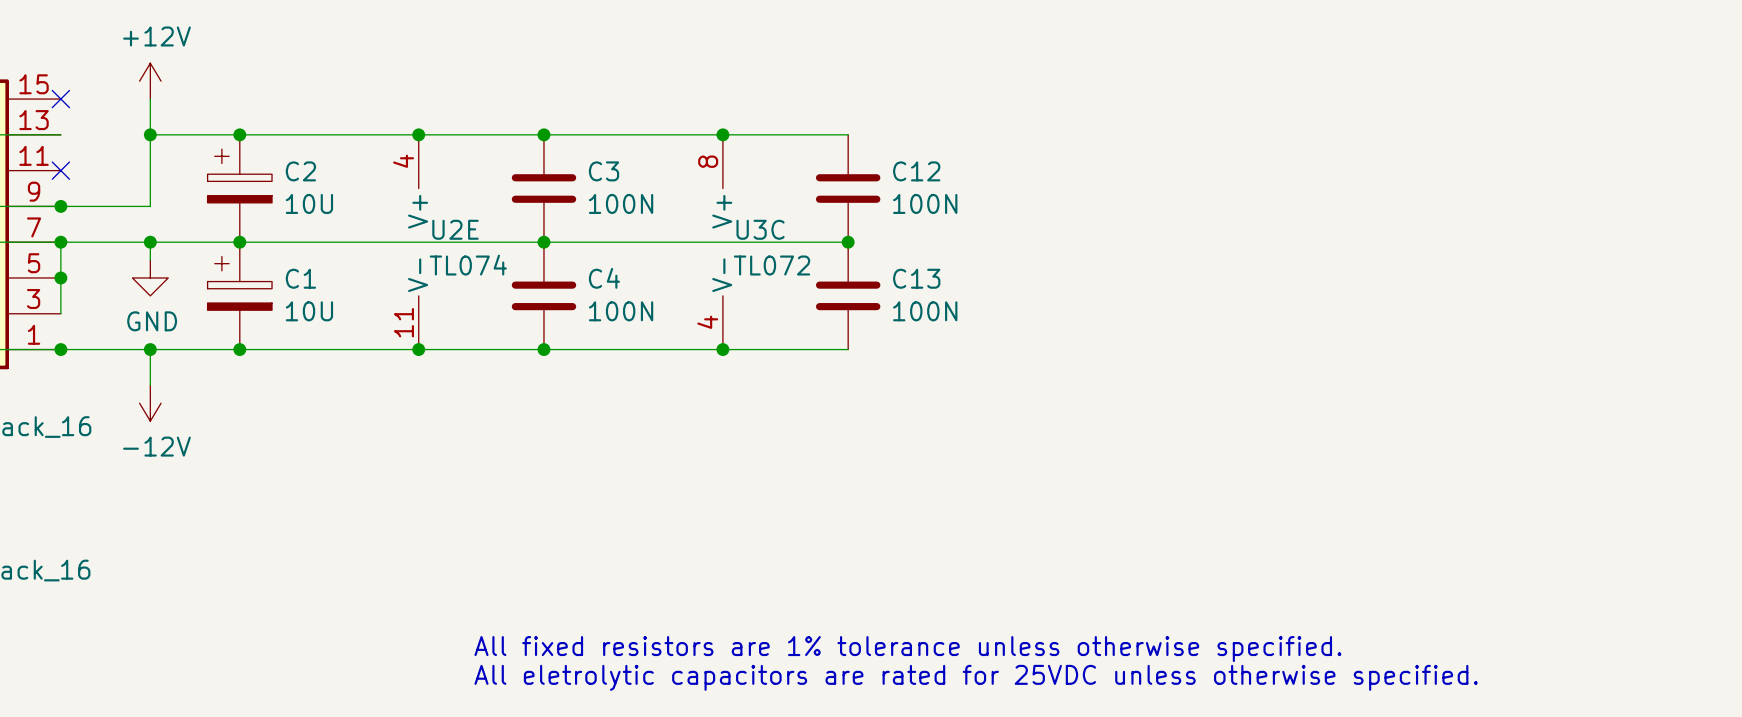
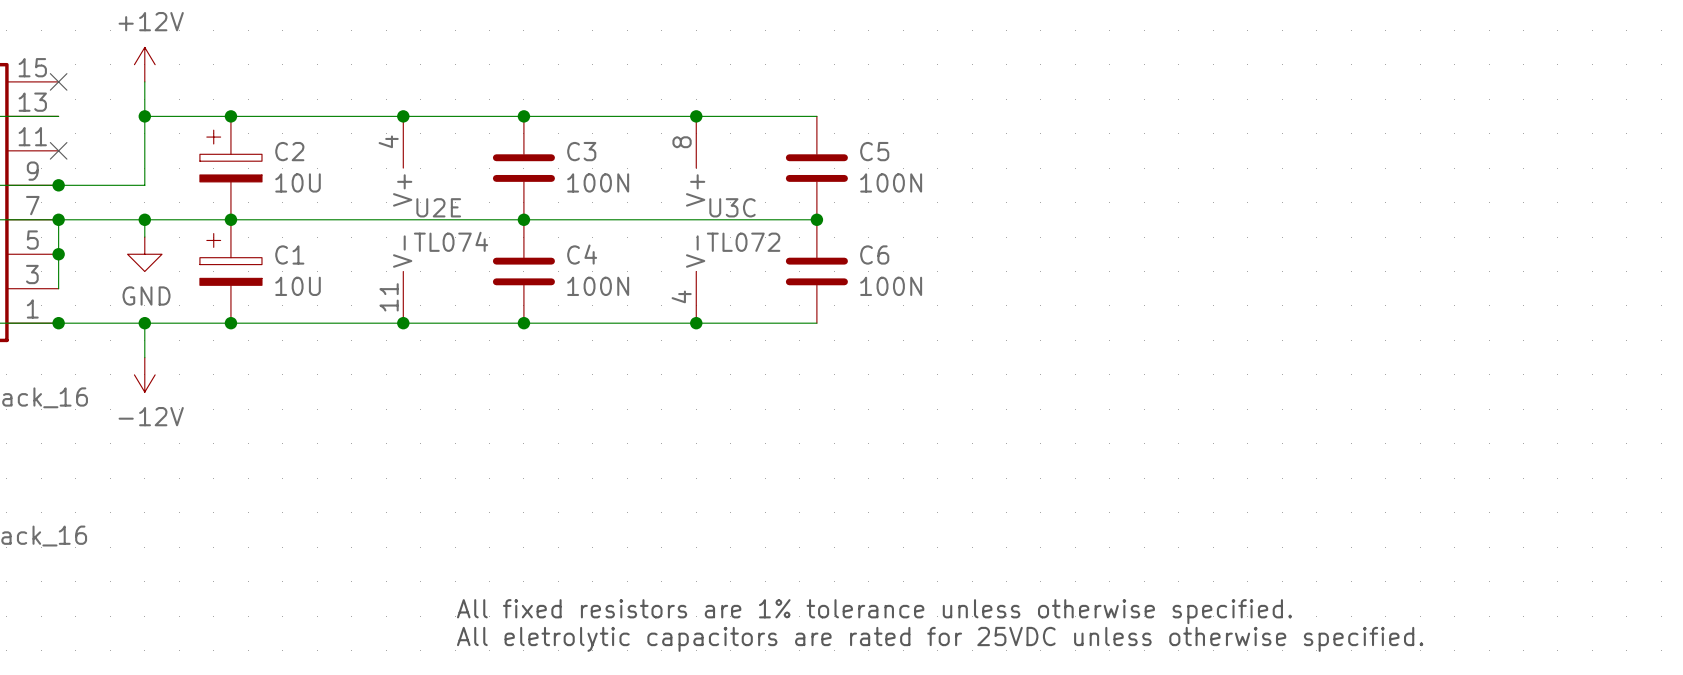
C12 name: C12 (916, 171) -> C5 (874, 151)
C13 name: C13 (916, 278) -> C6 (874, 254)

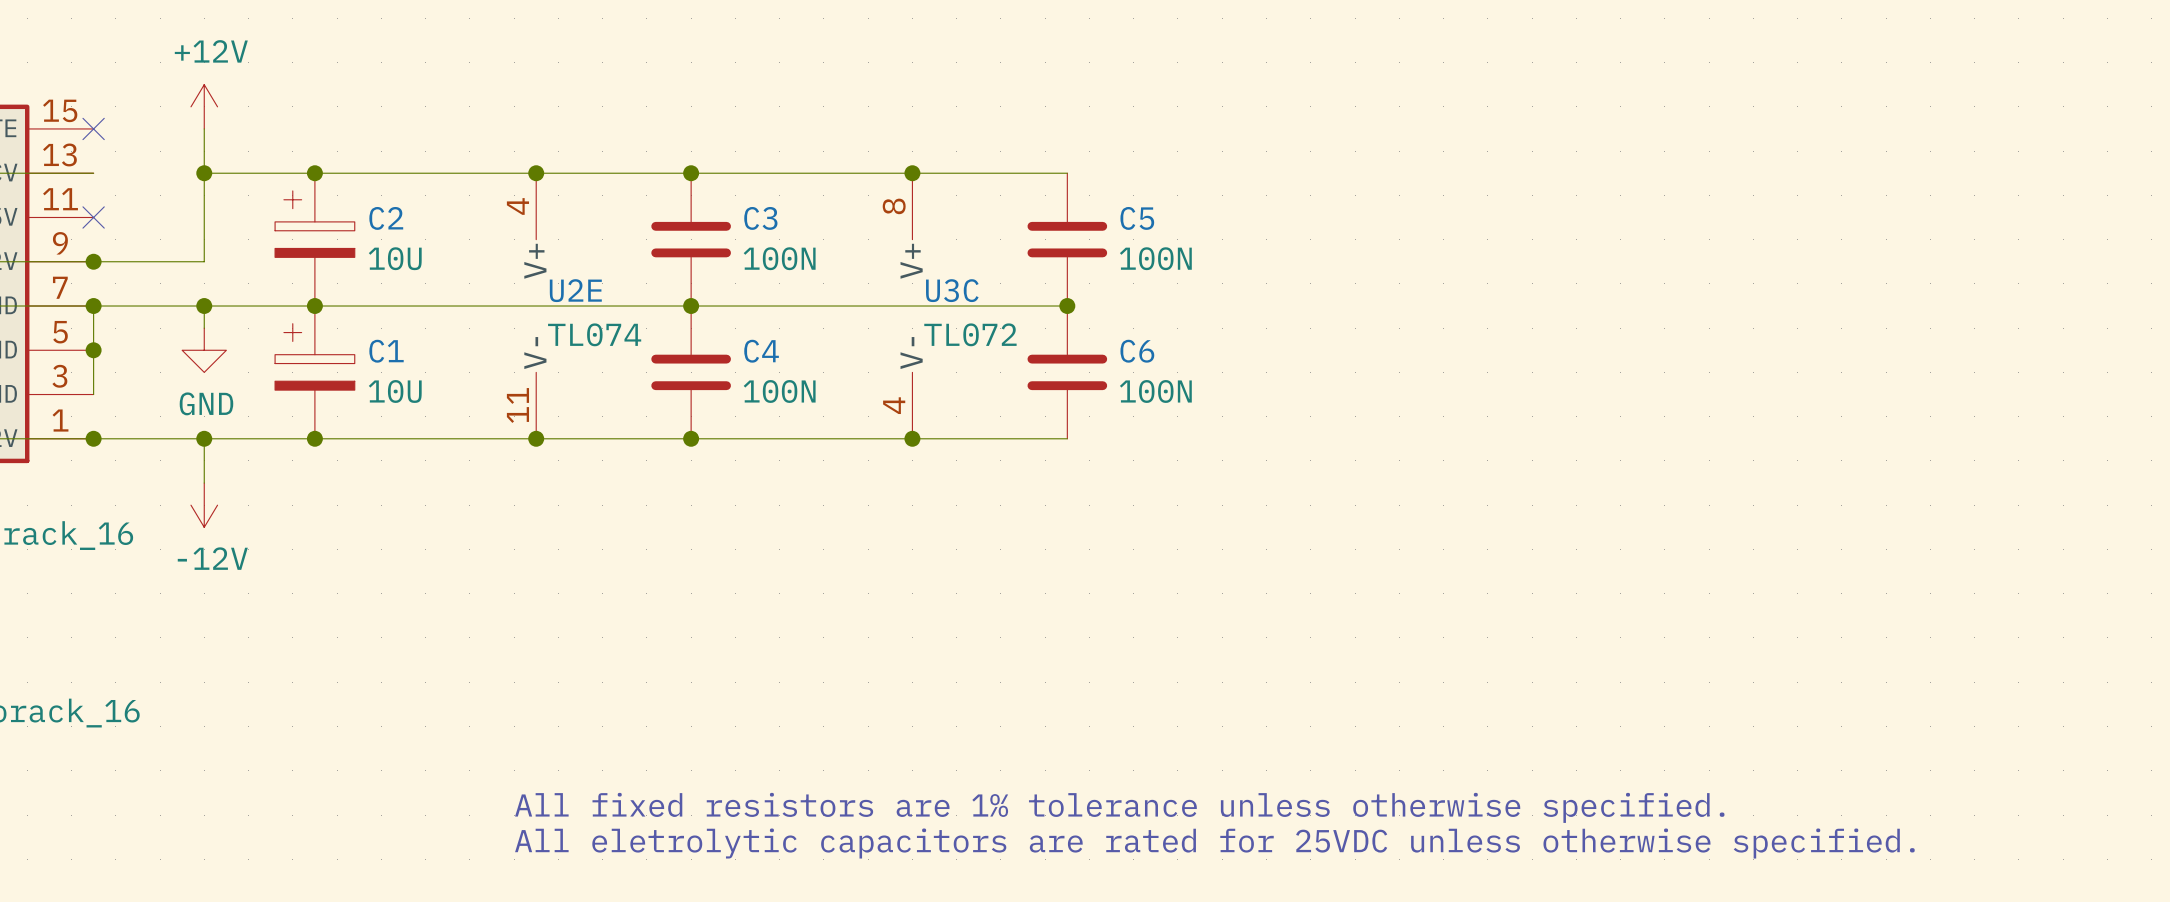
text position: All fixed resistors are 1% tolerance unless otherwise specified. (874, 611) -> All fixed resistors are 1% tolerance unless otherwise specified. (1119, 807)
text position: All eletrolytic capacitors are rated for 25VDC unless otherwise specified. (940, 639) -> All eletrolytic capacitors are rated for 25VDC unless otherwise specified. (1214, 843)

